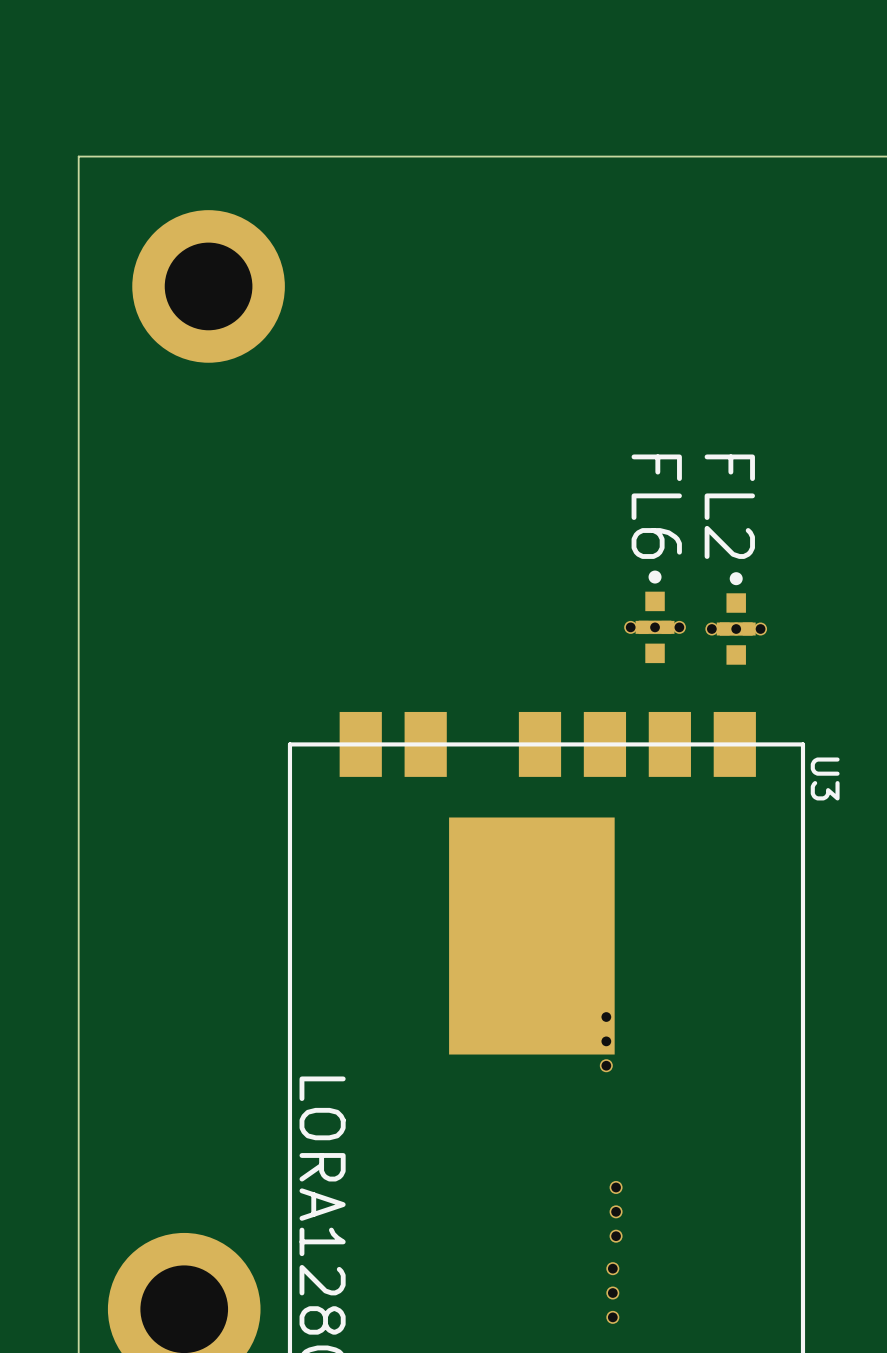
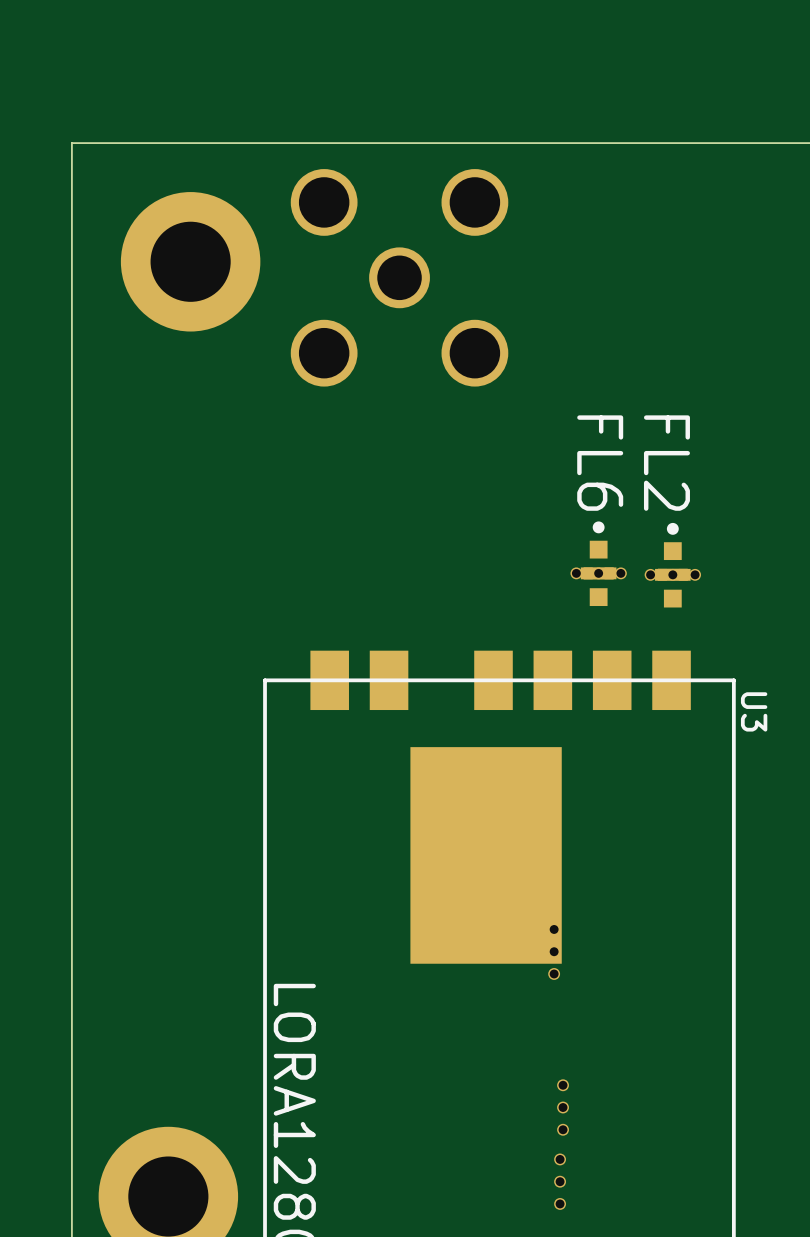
part: none -> (399, 277)

